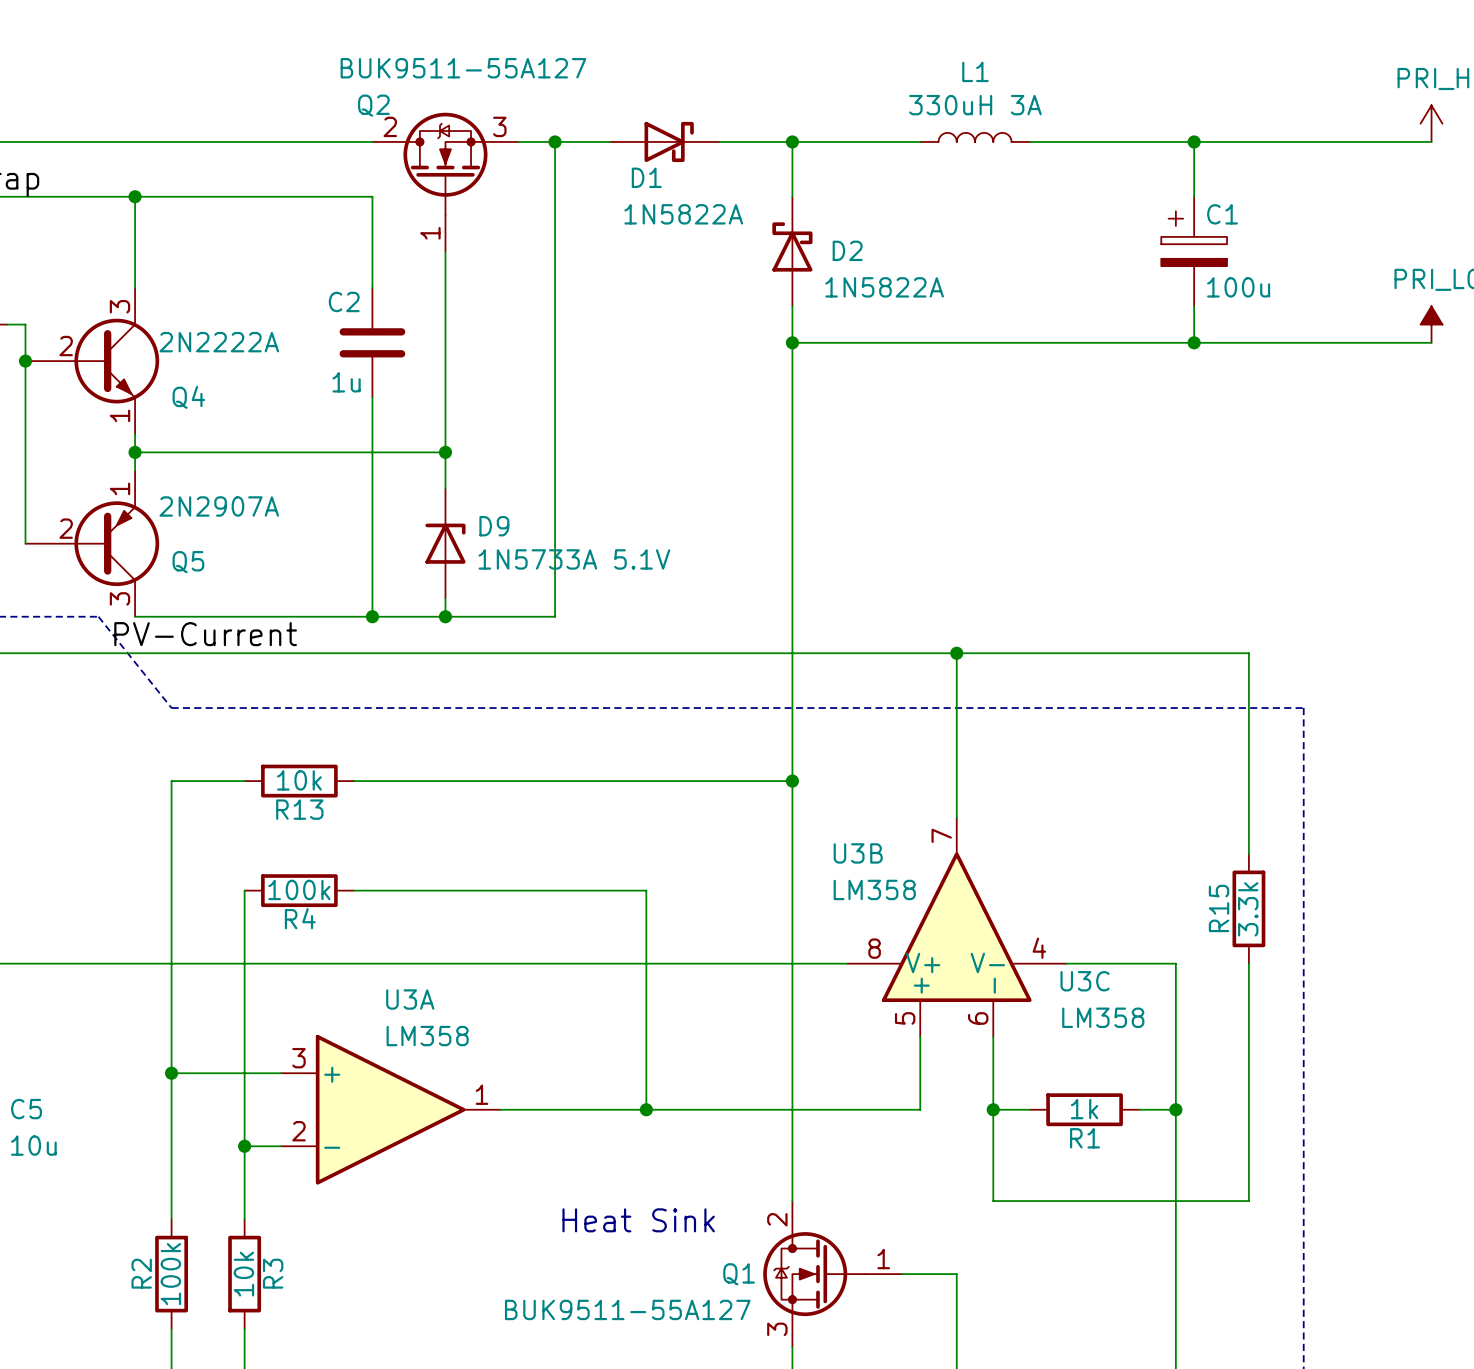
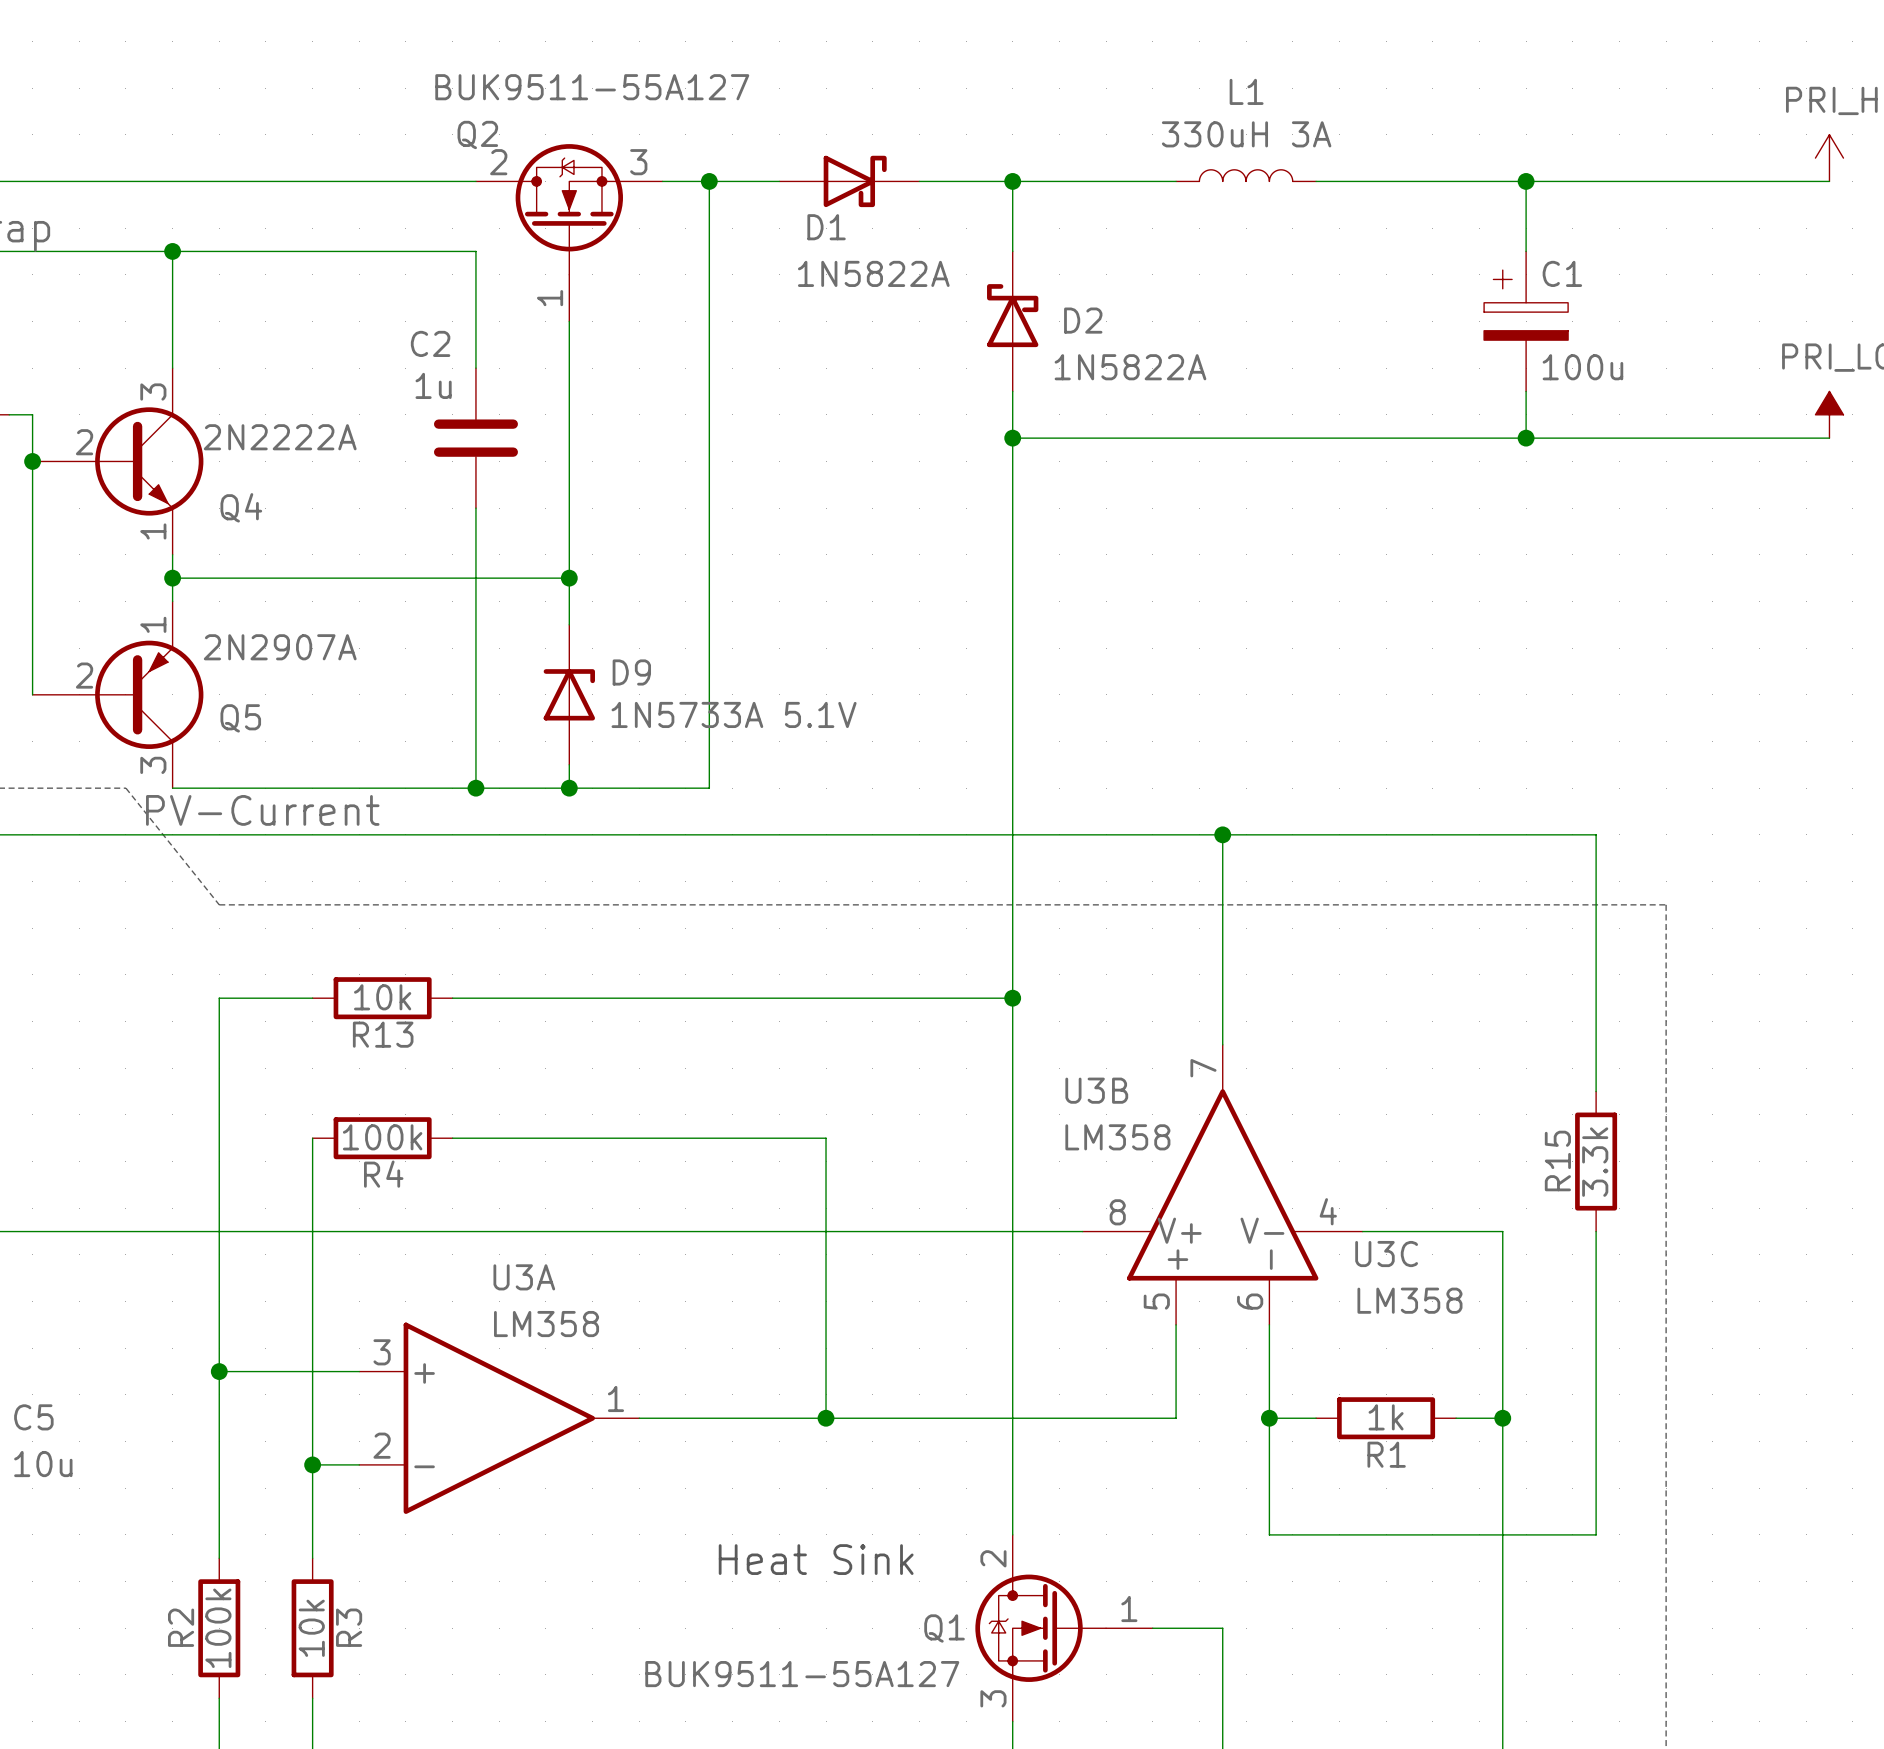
C2 name position: C2 (344, 301) -> C2 (430, 343)
C2 value position: 1u (346, 382) -> 1u (433, 385)

